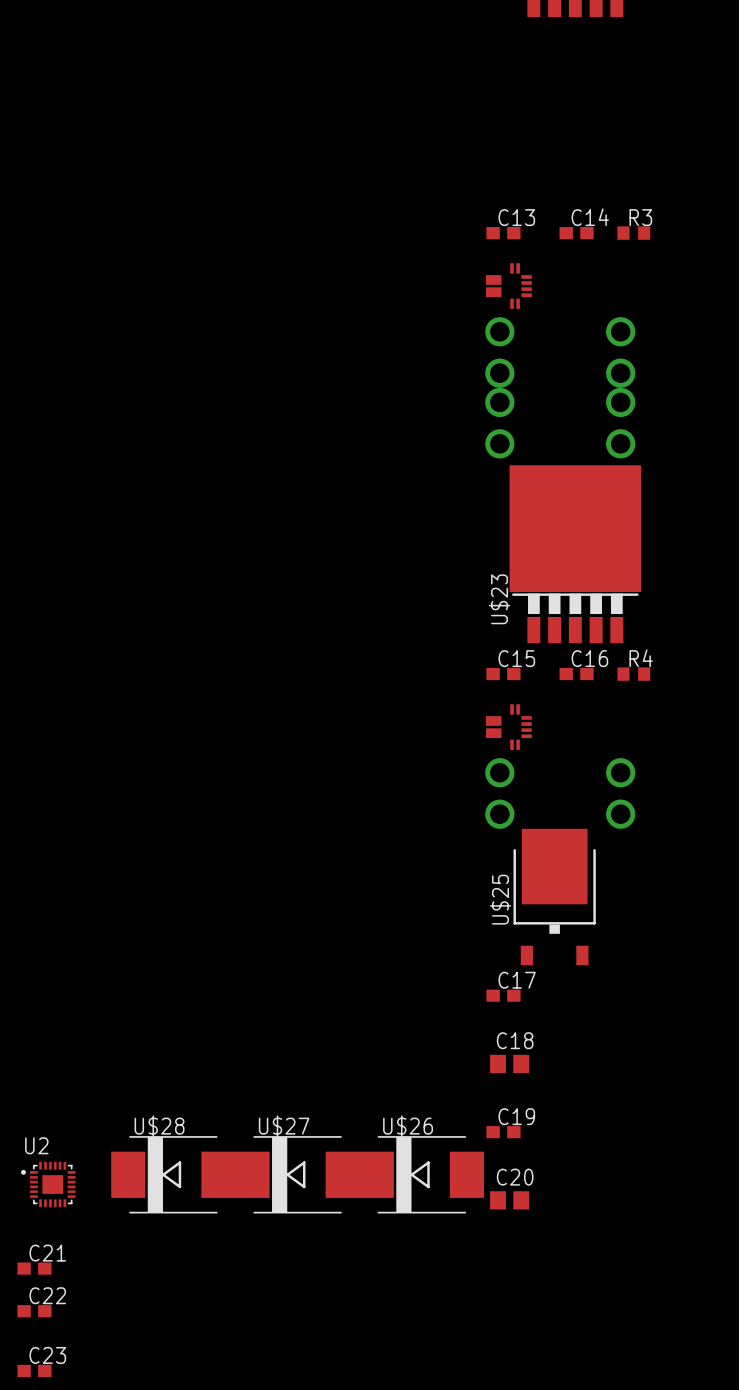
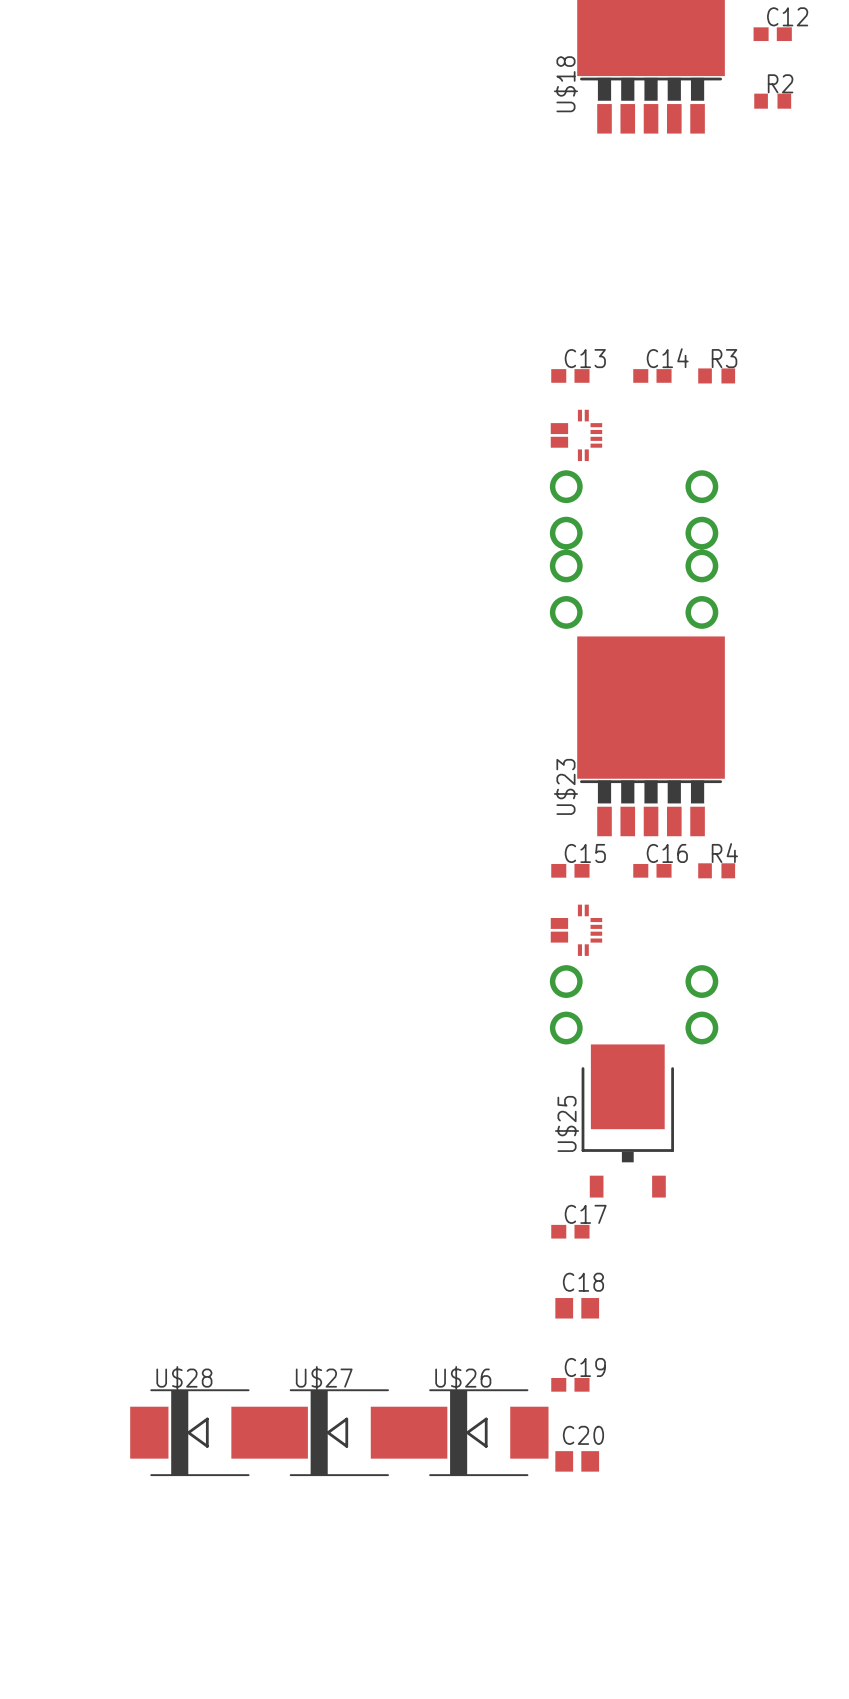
U2: (48, 1184) -> none
C21: (34, 1268) -> none
C22: (34, 1311) -> none
C23: (34, 1370) -> none

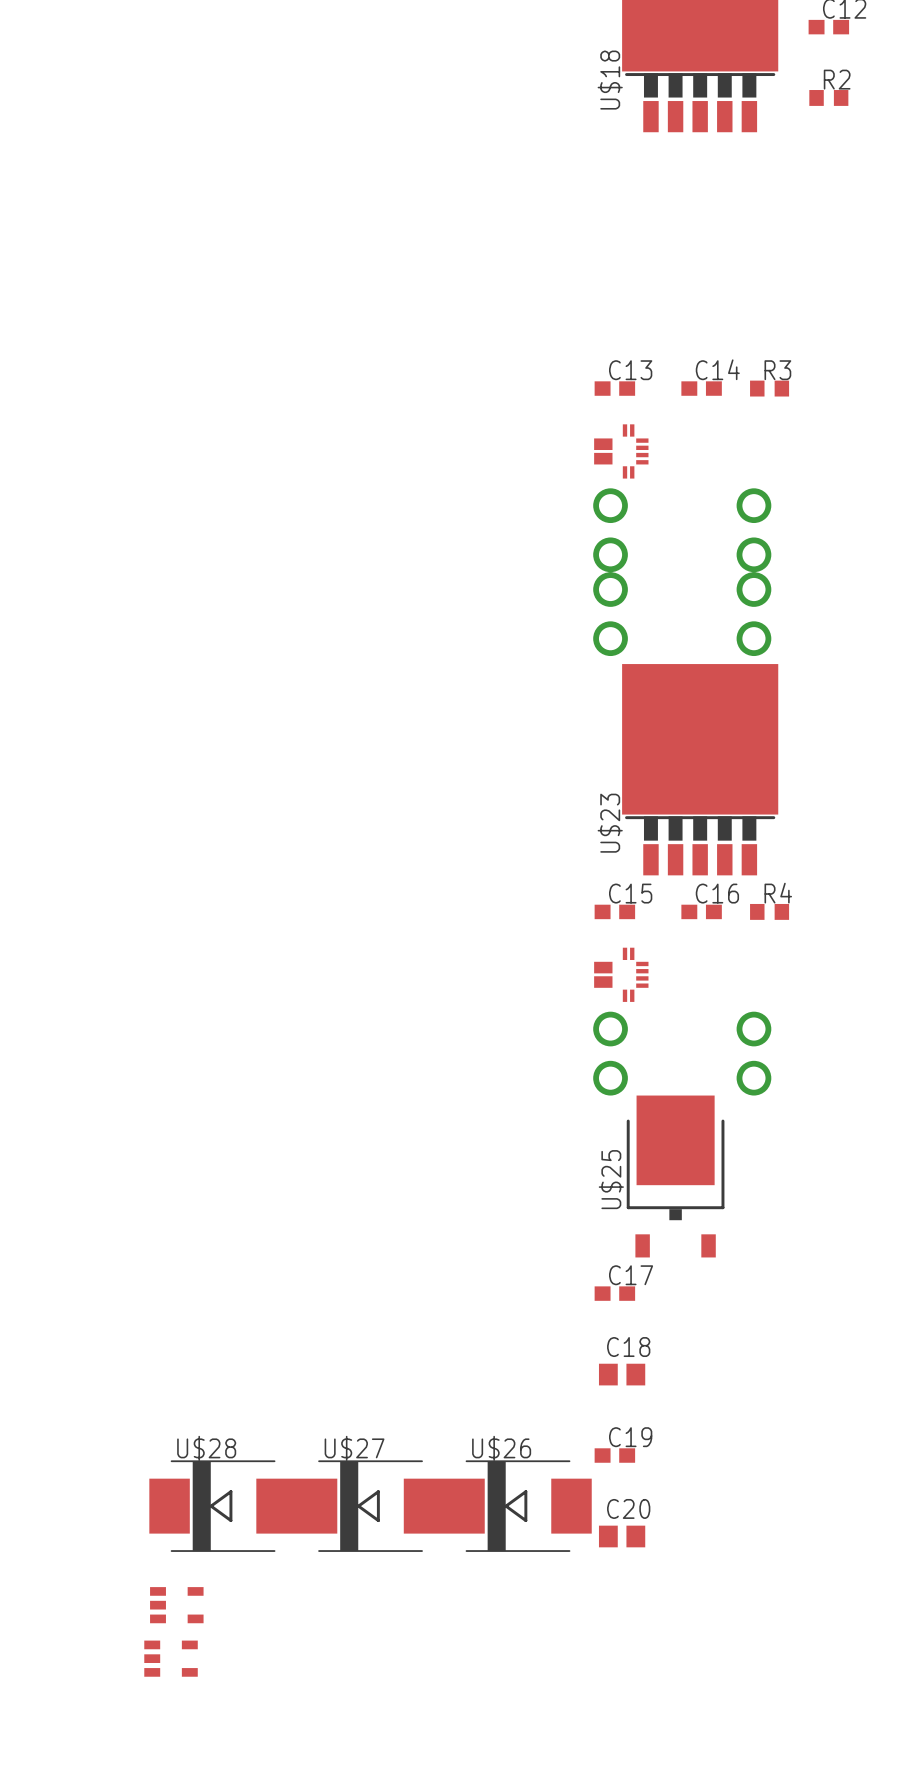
part: none -> (176, 1605)
part: none -> (171, 1658)

